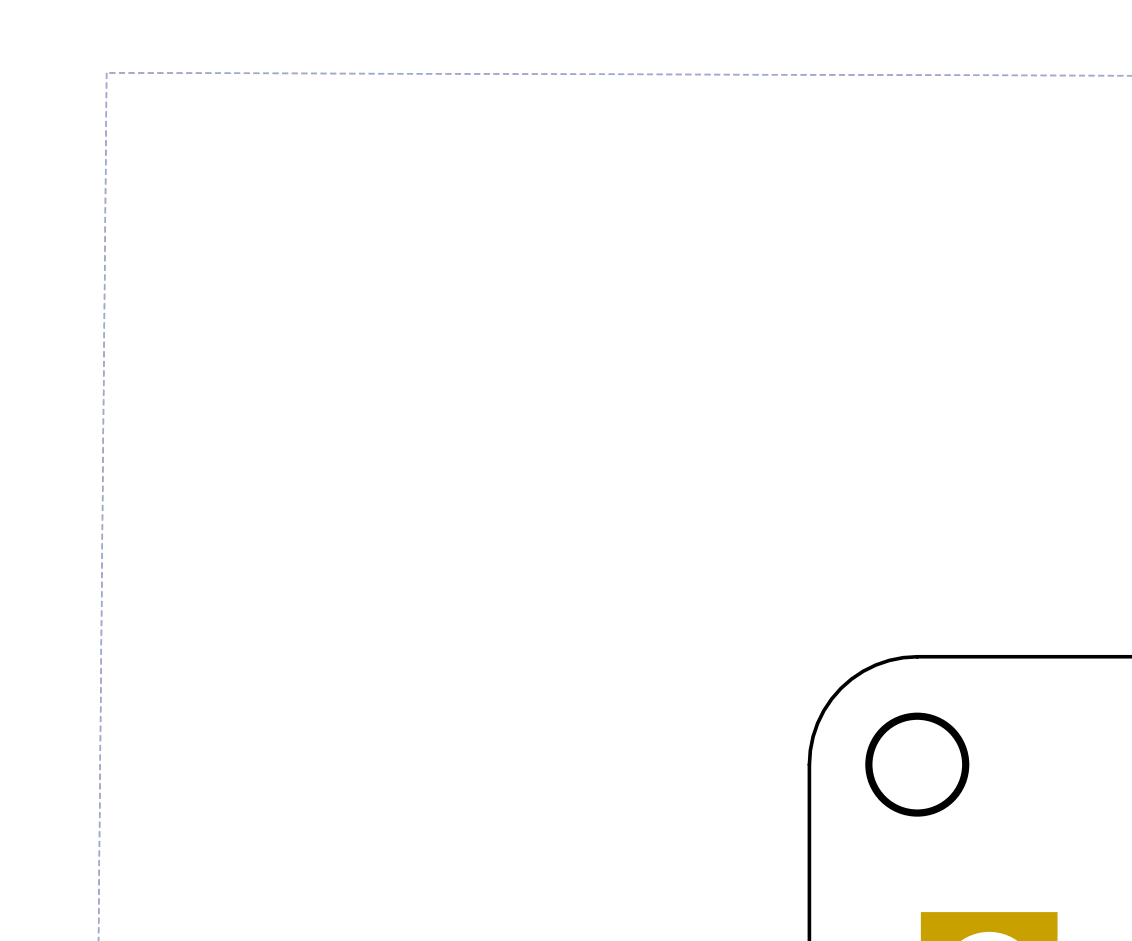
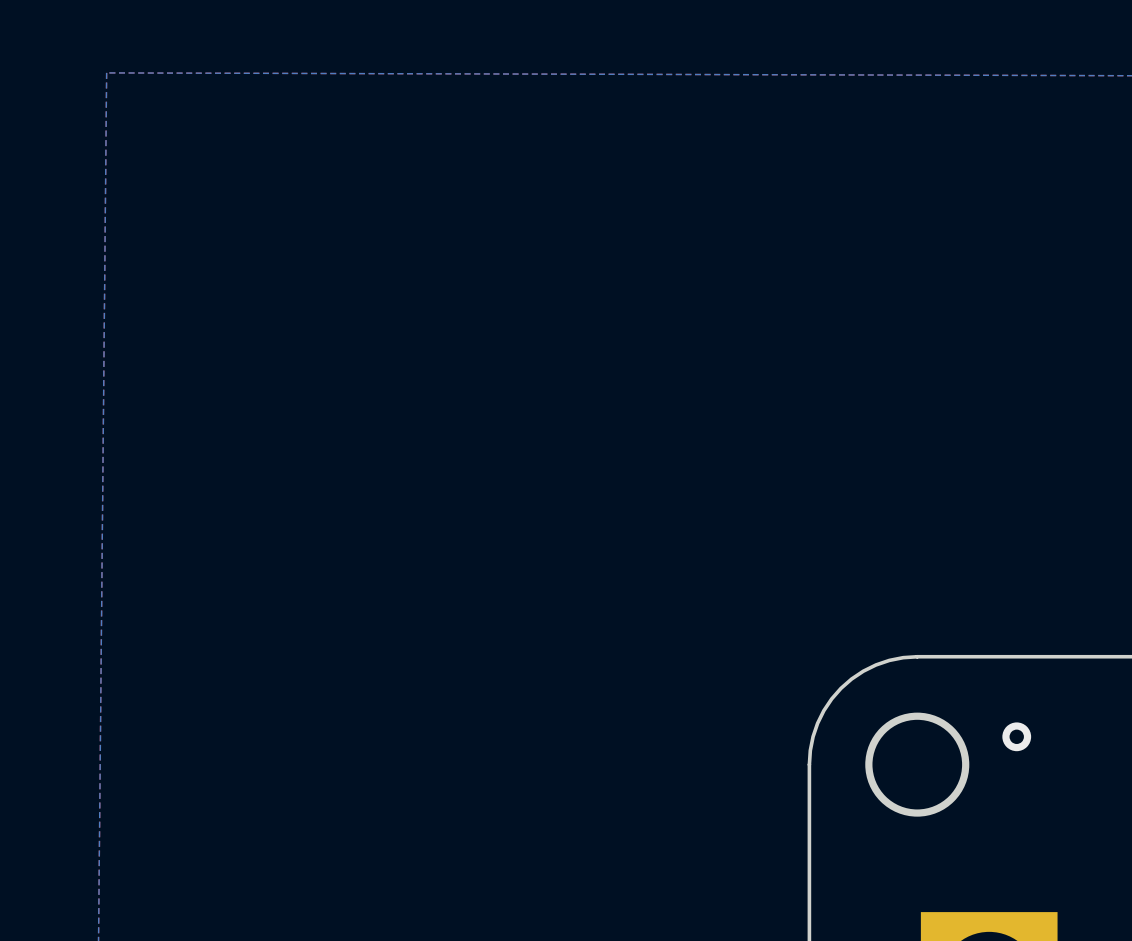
via: none -> (1016, 736)

